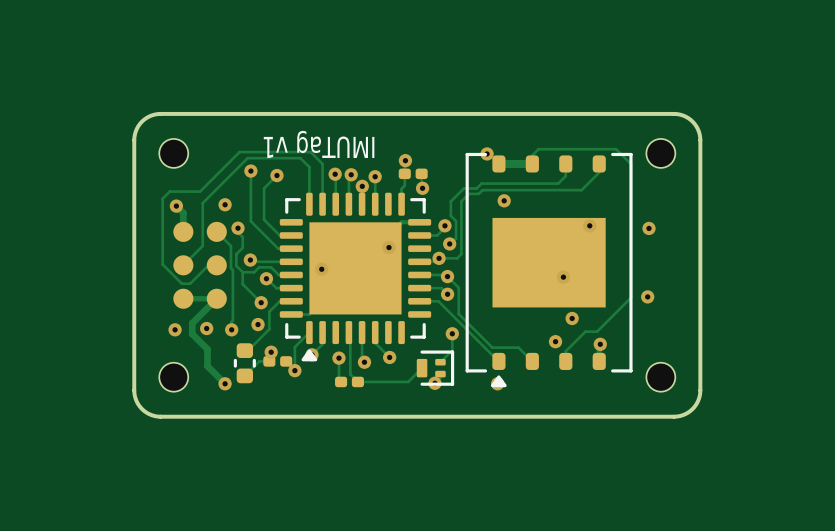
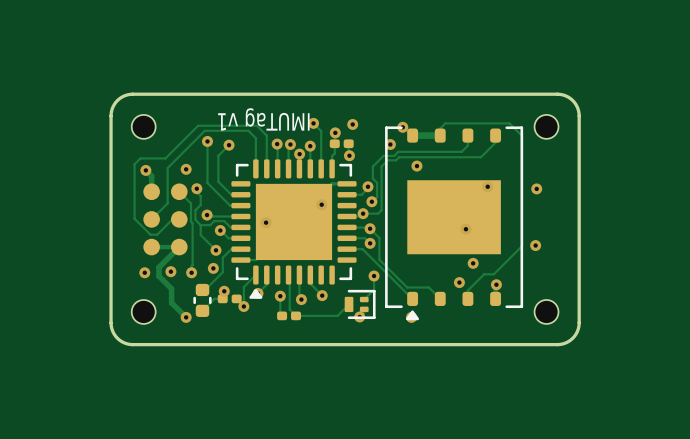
track: none -> (313, 123) (321, 131) (321, 168)
via: none -> (313, 123)
via: none -> (352, 124)
via: none -> (390, 144)

